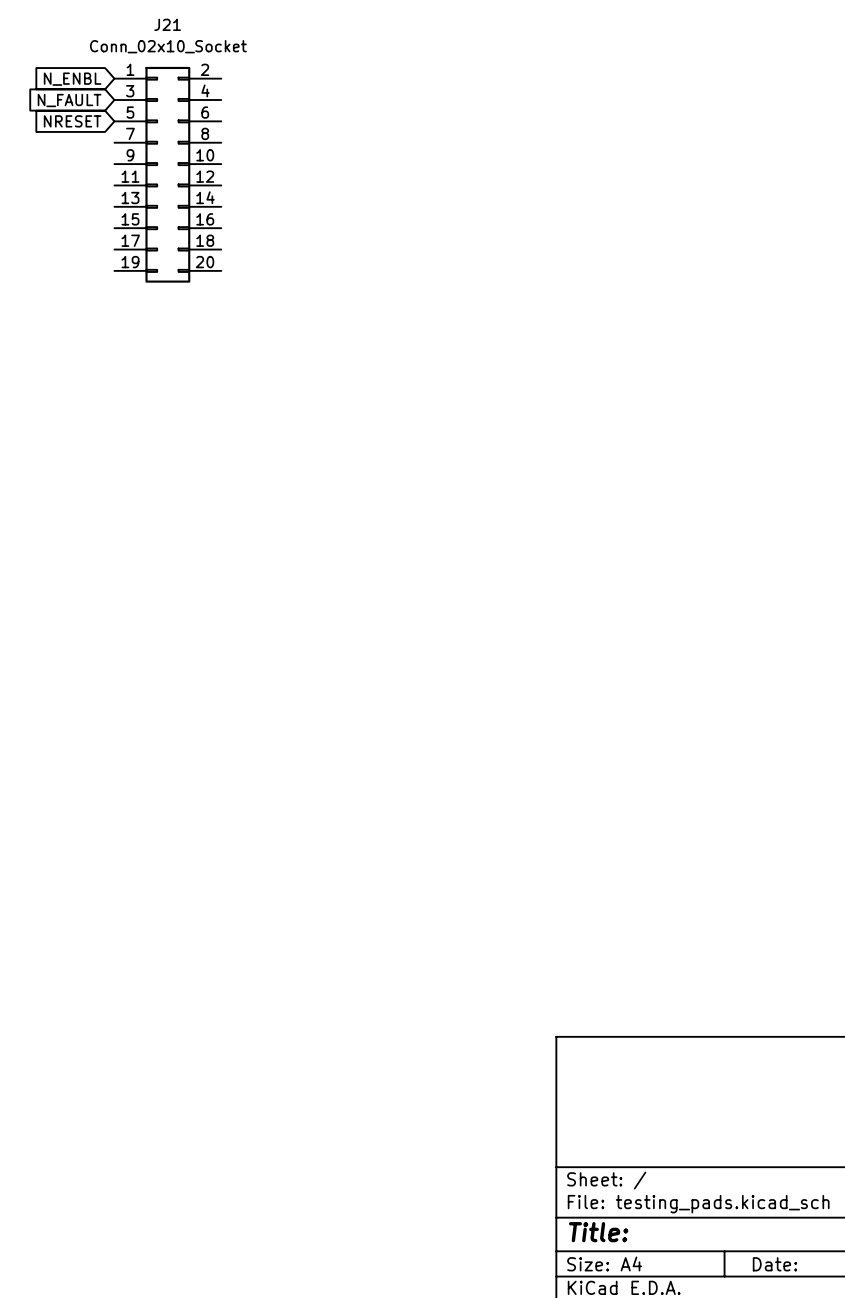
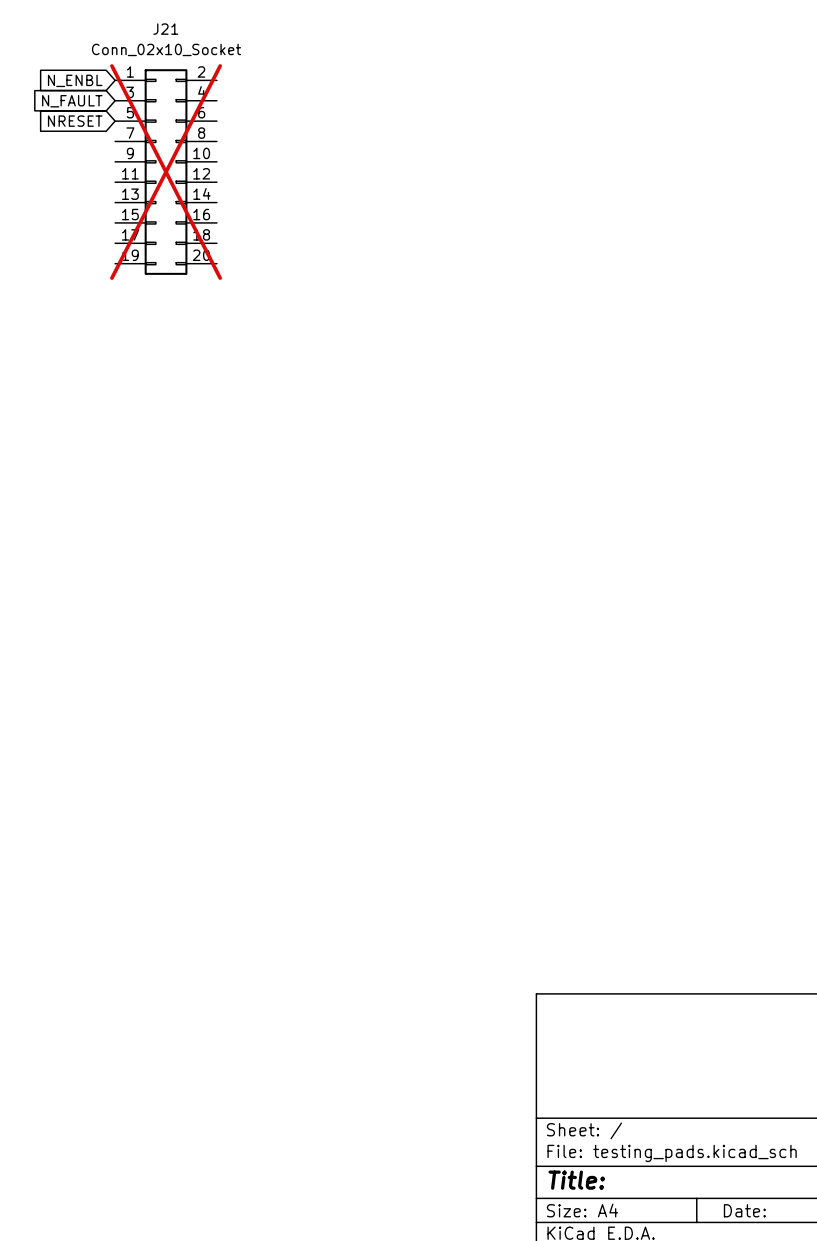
J21 do-not-place cross: none -> (166, 172)

